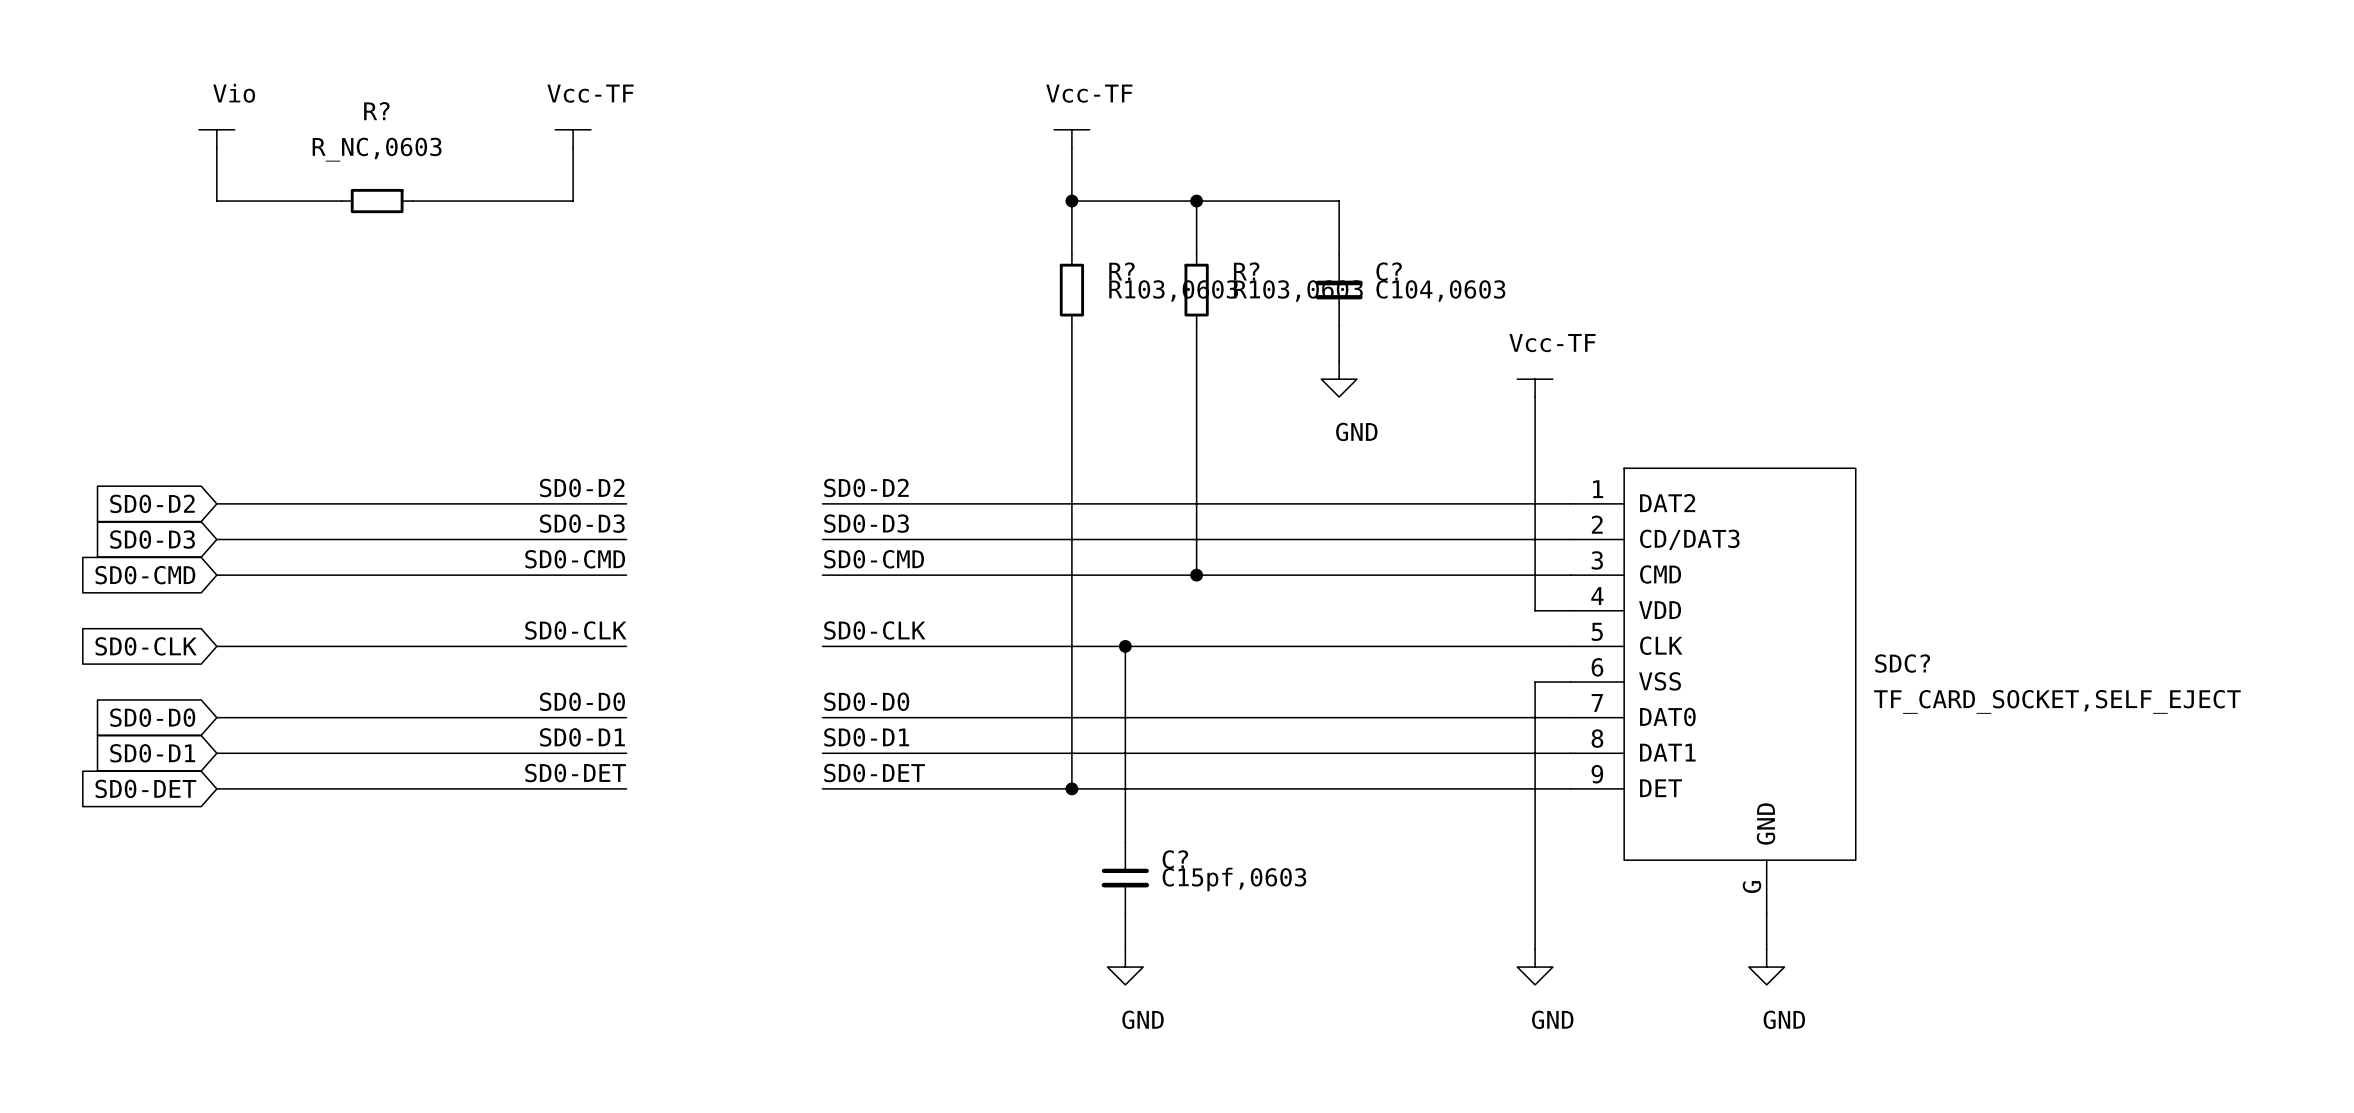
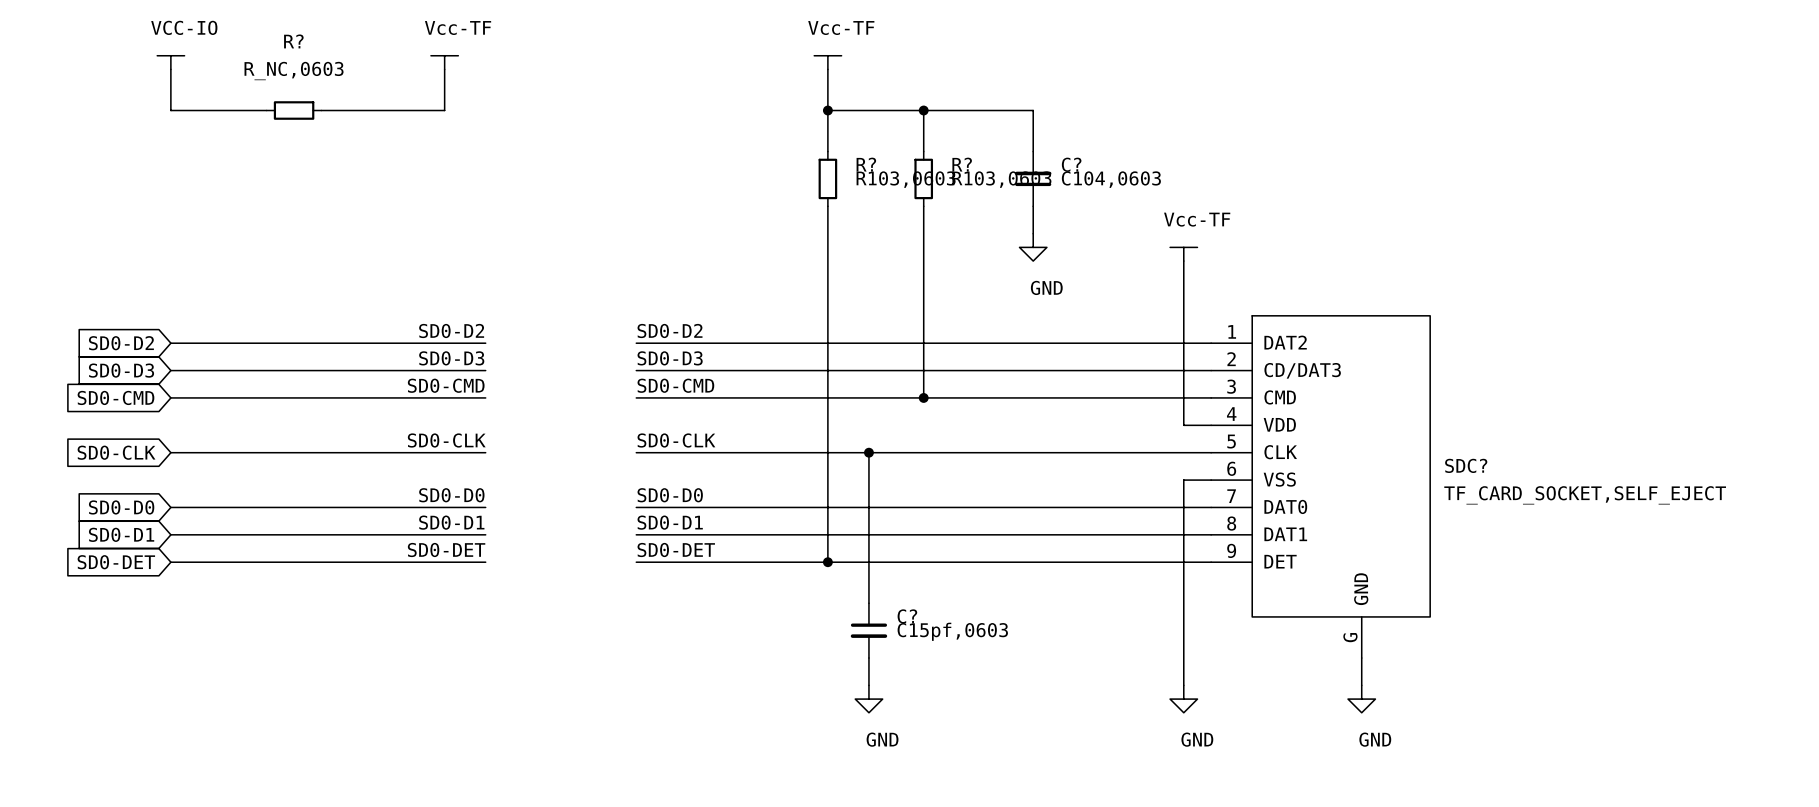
power symbol: Vio (216, 138) -> VCC-IO (170, 62)

